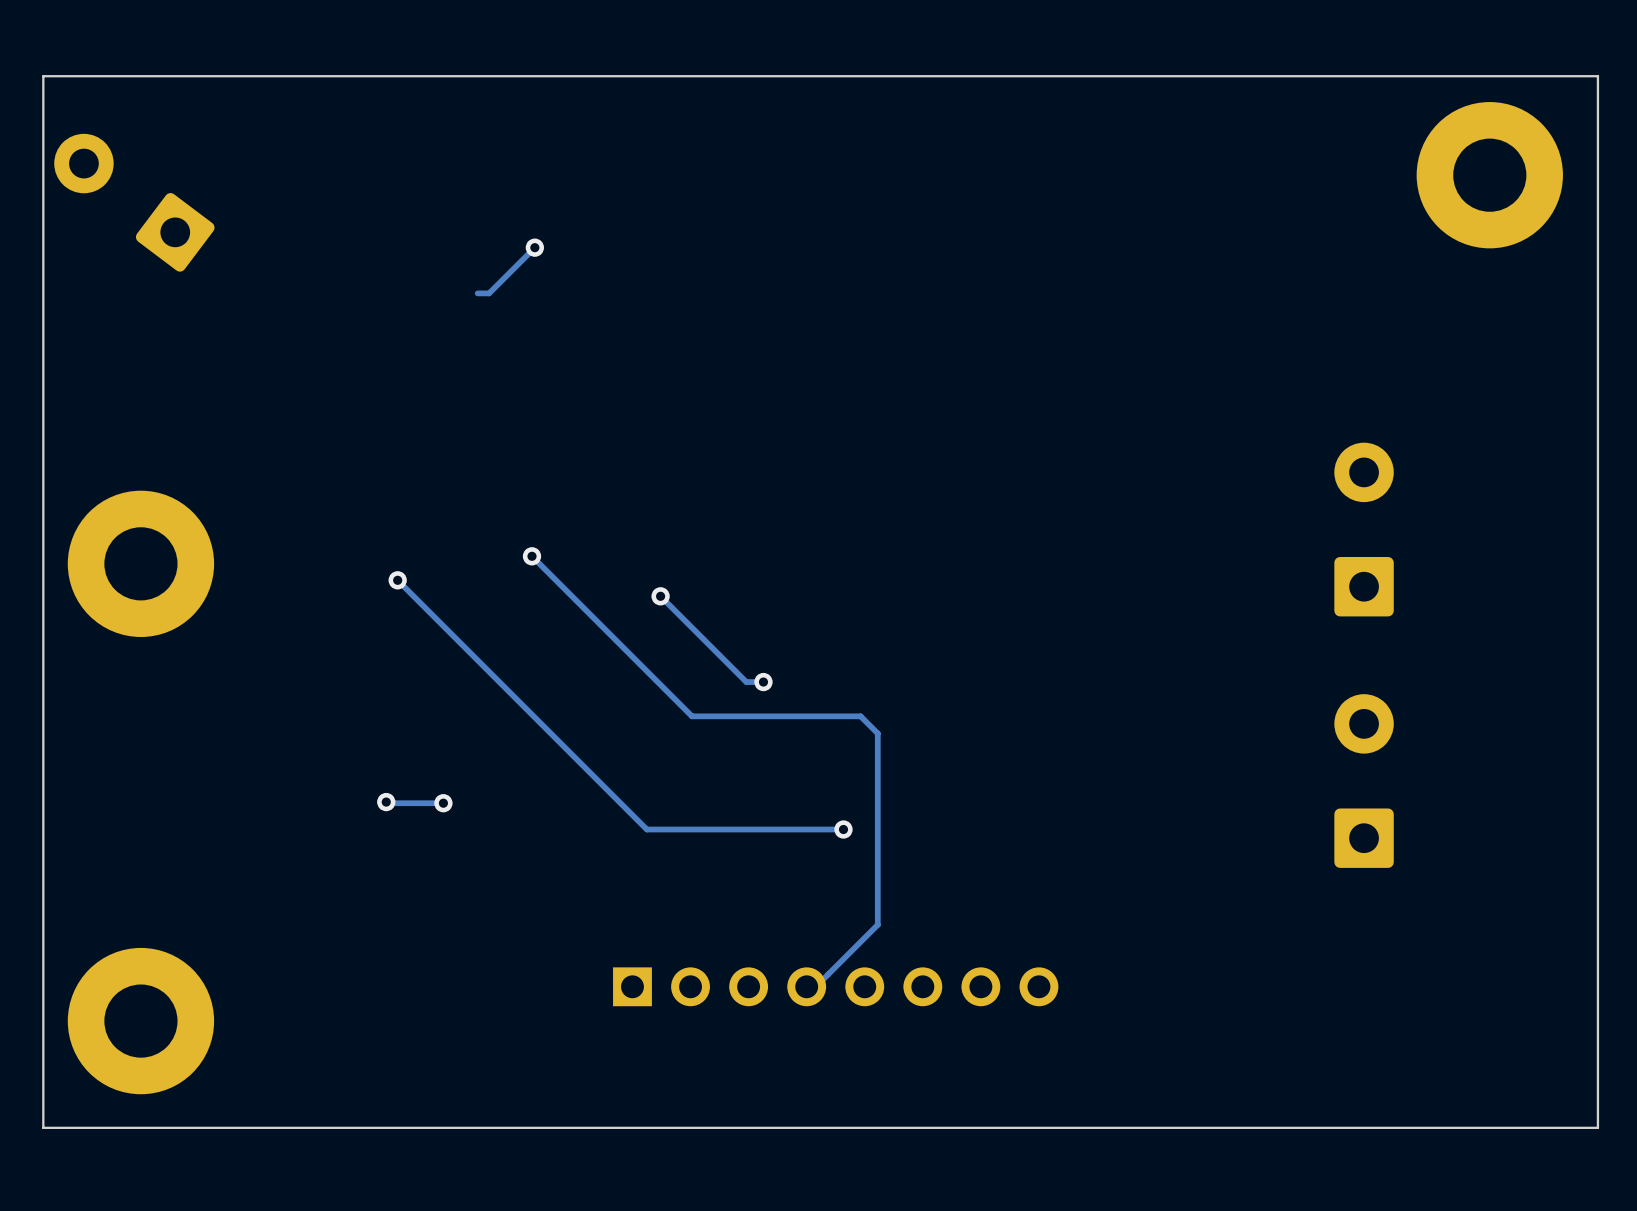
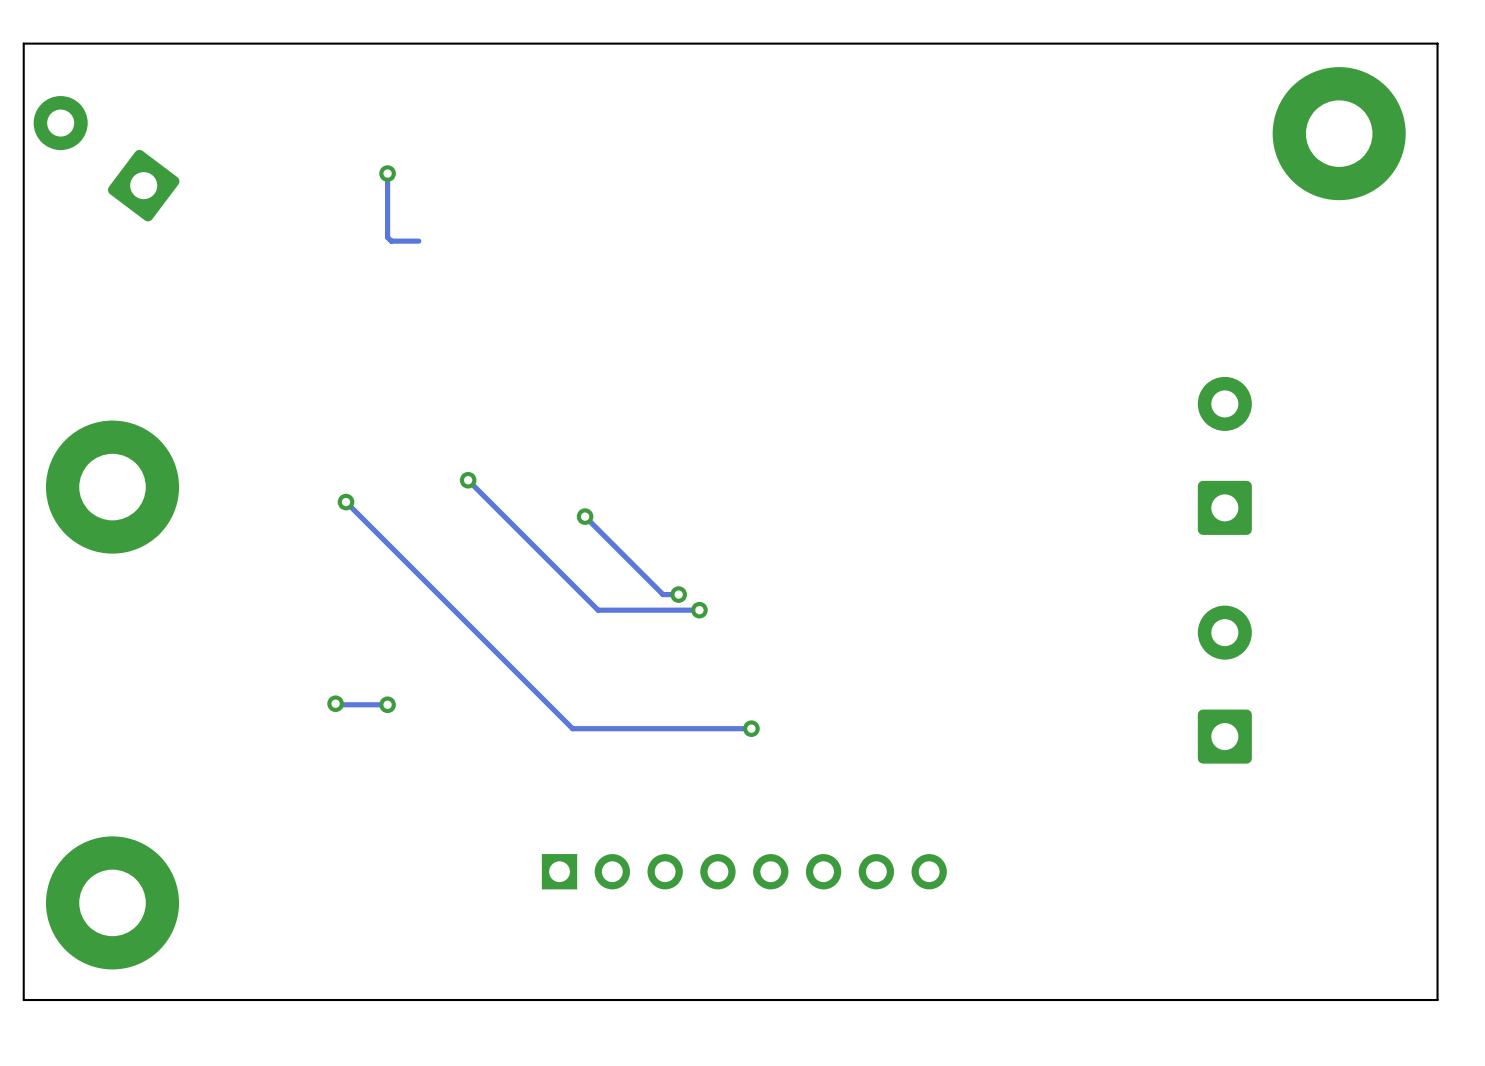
track: (534, 247) (489, 293) (477, 293) -> (387, 173) (387, 237) (391, 241) (418, 241)
via position: (534, 247) -> (387, 173)
track: (674, 699) (692, 716) (860, 716) (877, 733) (877, 924) (811, 990) -> (598, 610) (699, 610)
via: none -> (699, 610)

